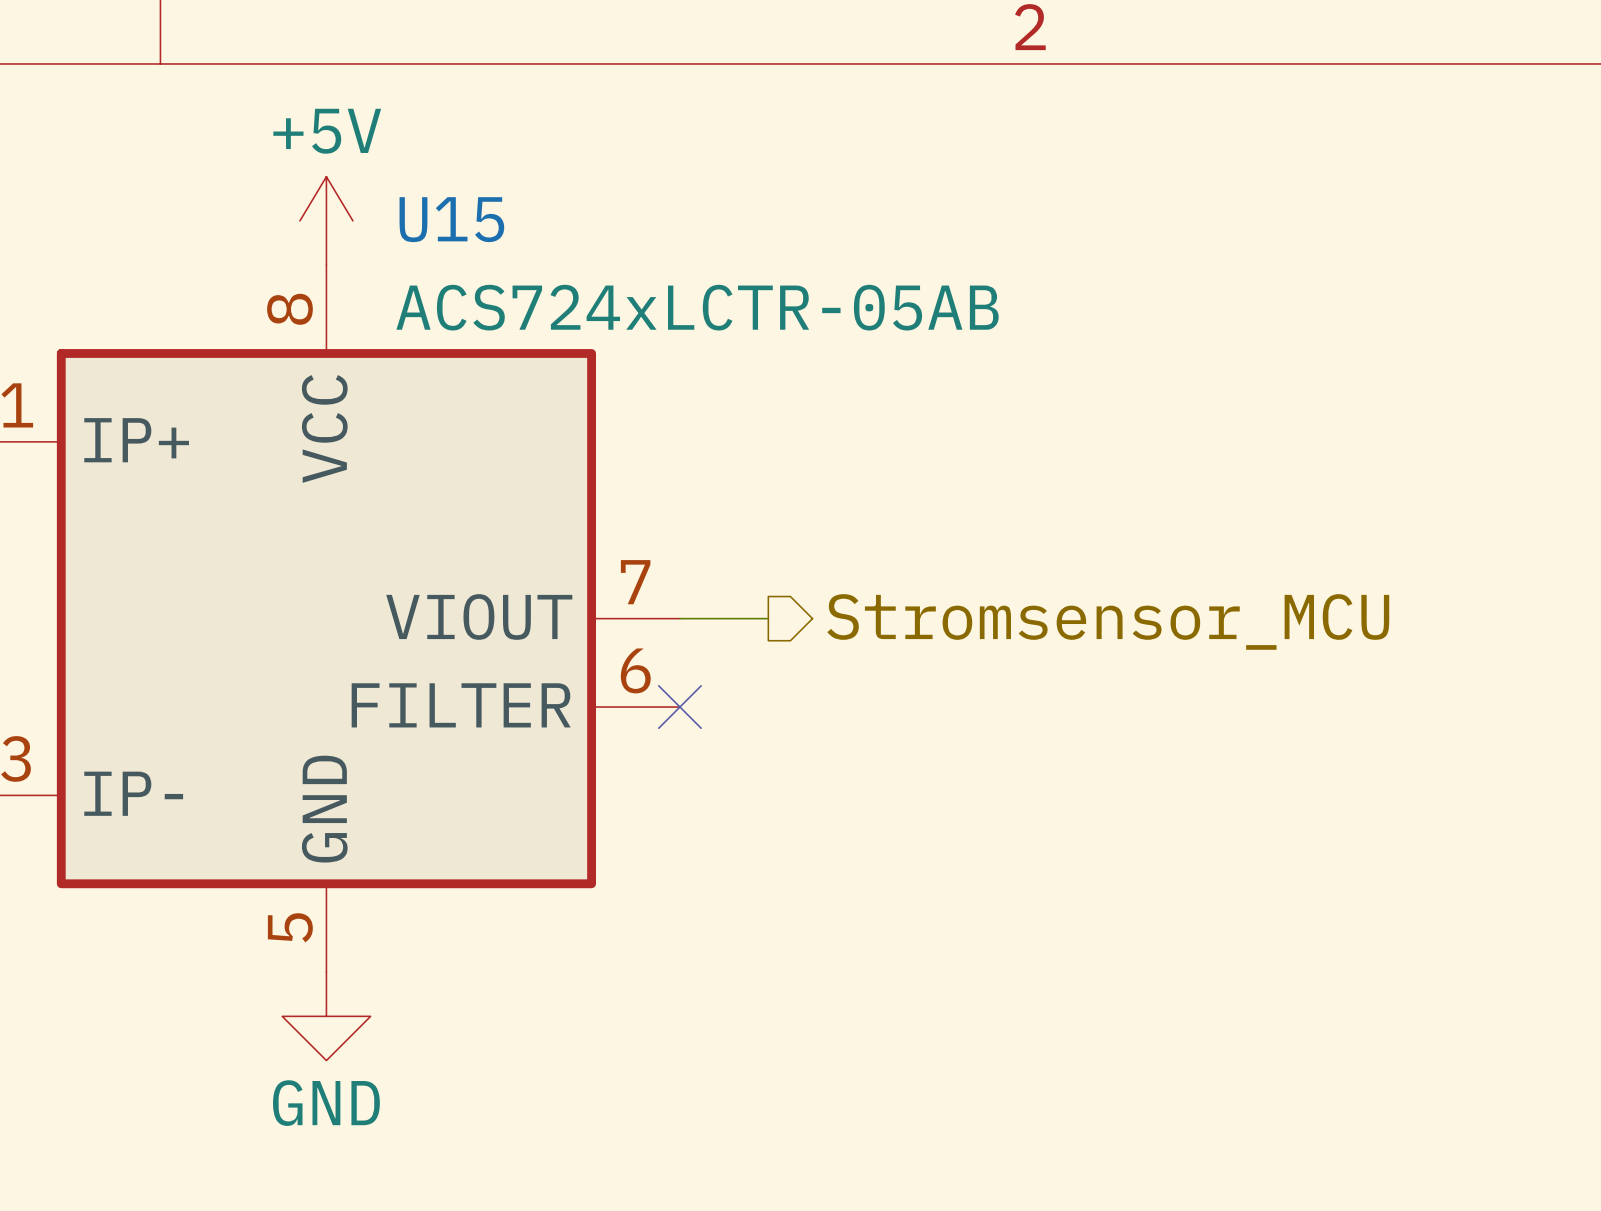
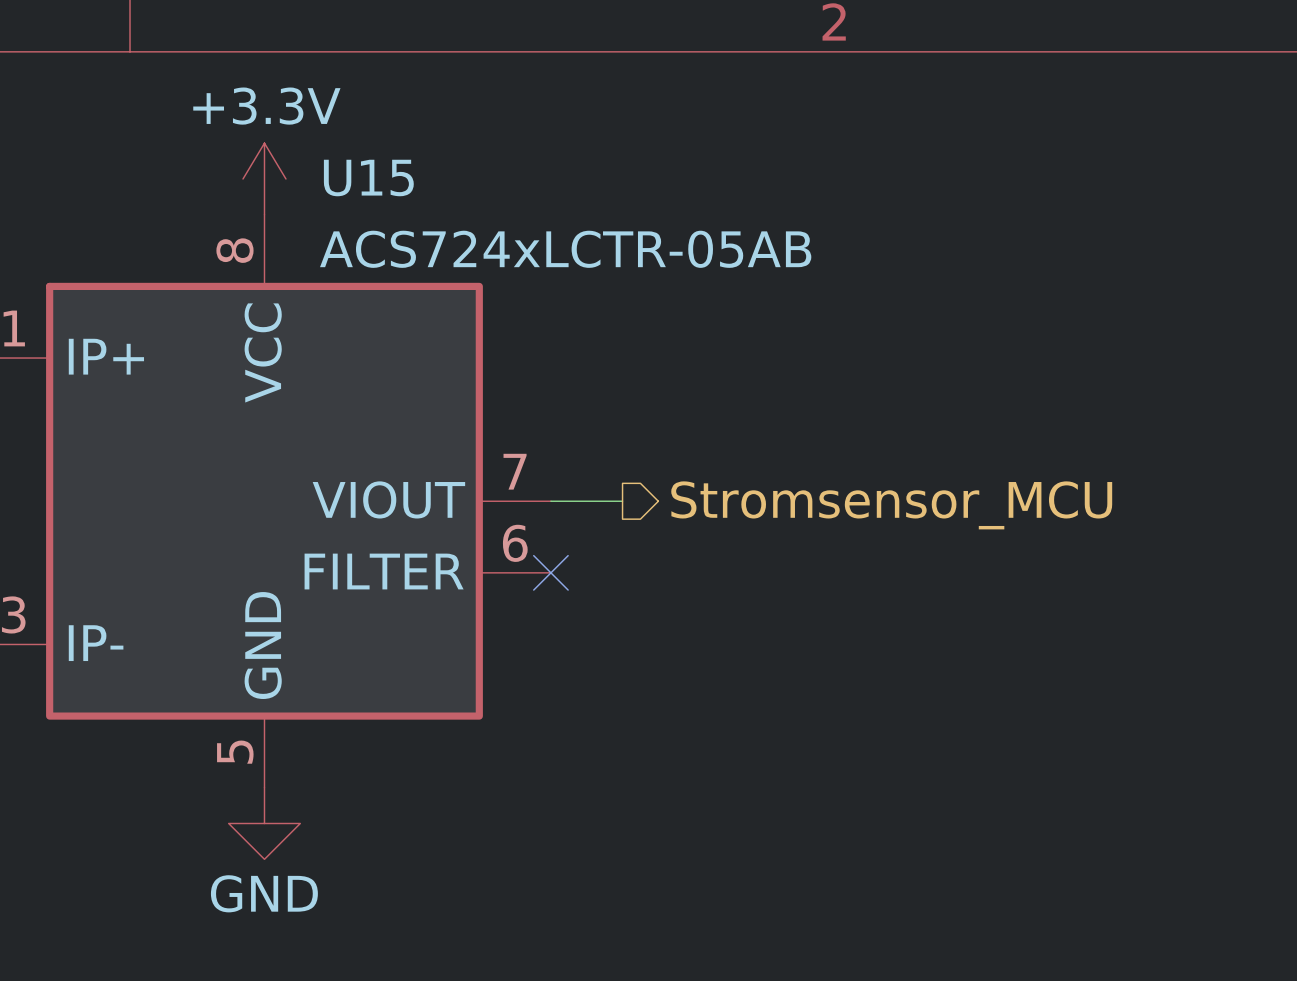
power symbol: +5V (326, 220) -> +3.3V (264, 178)

